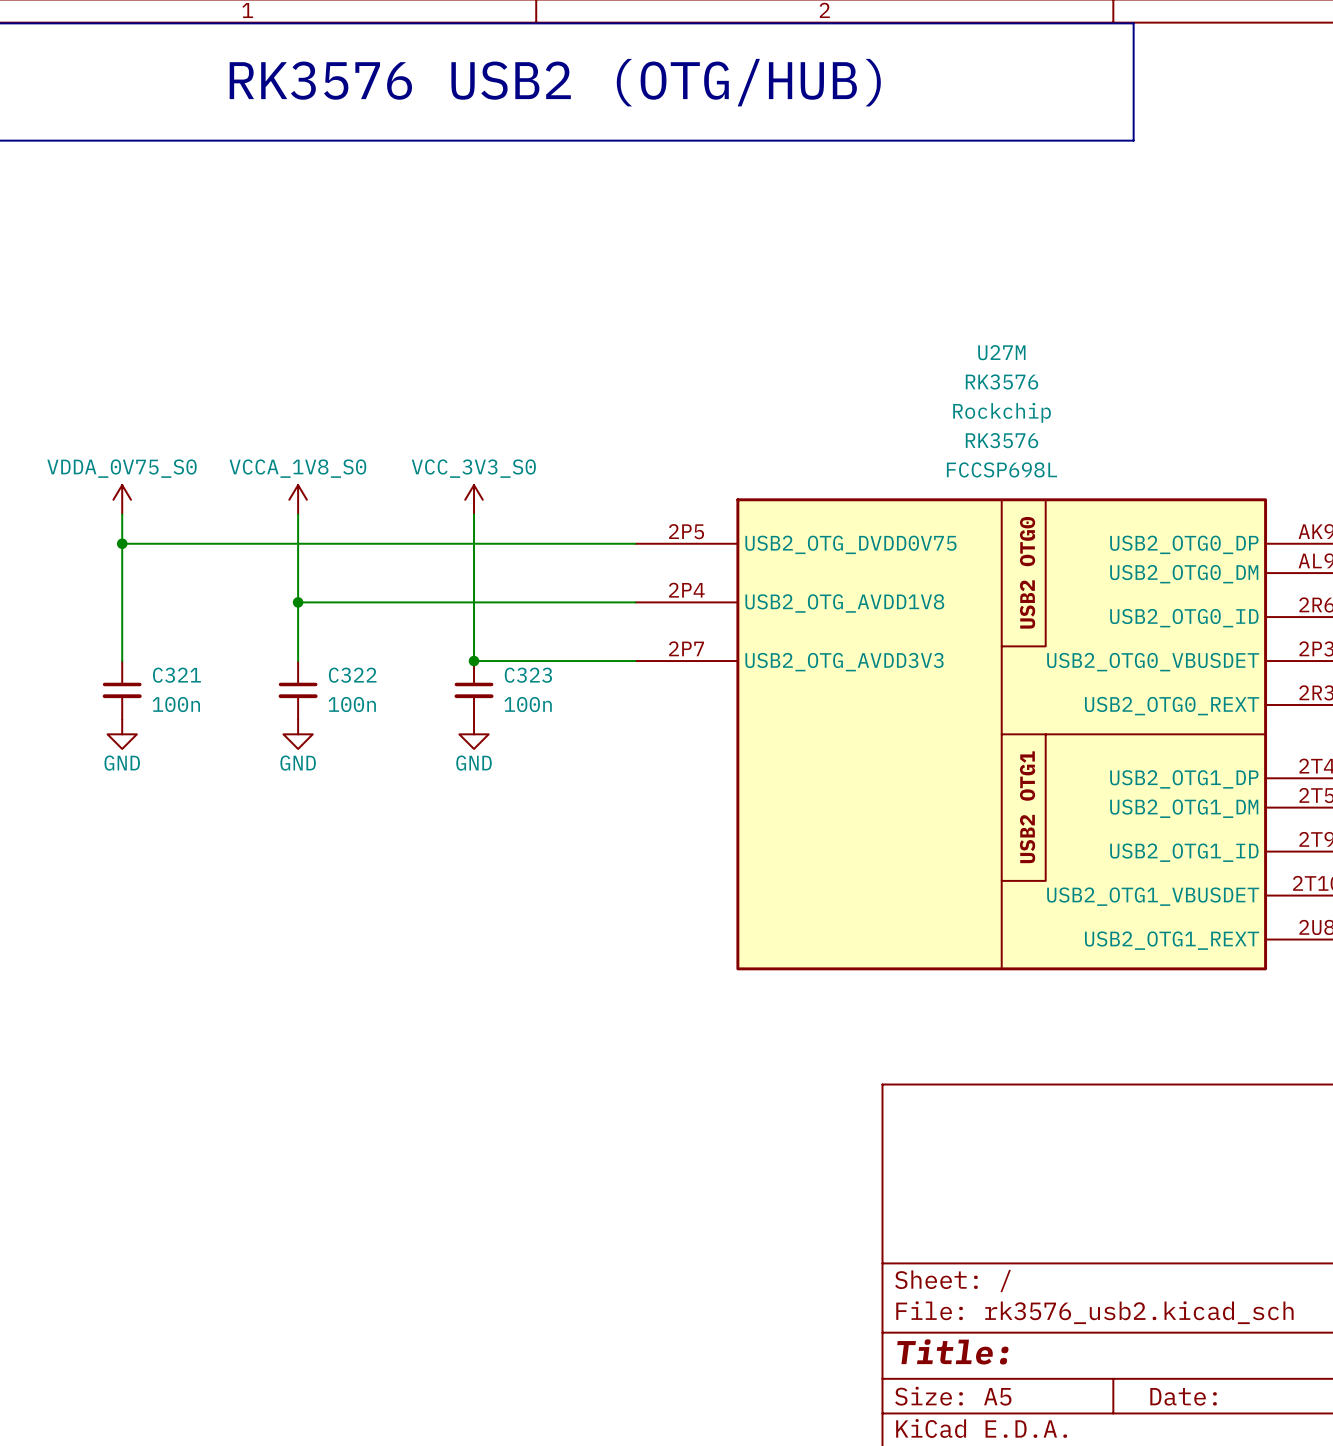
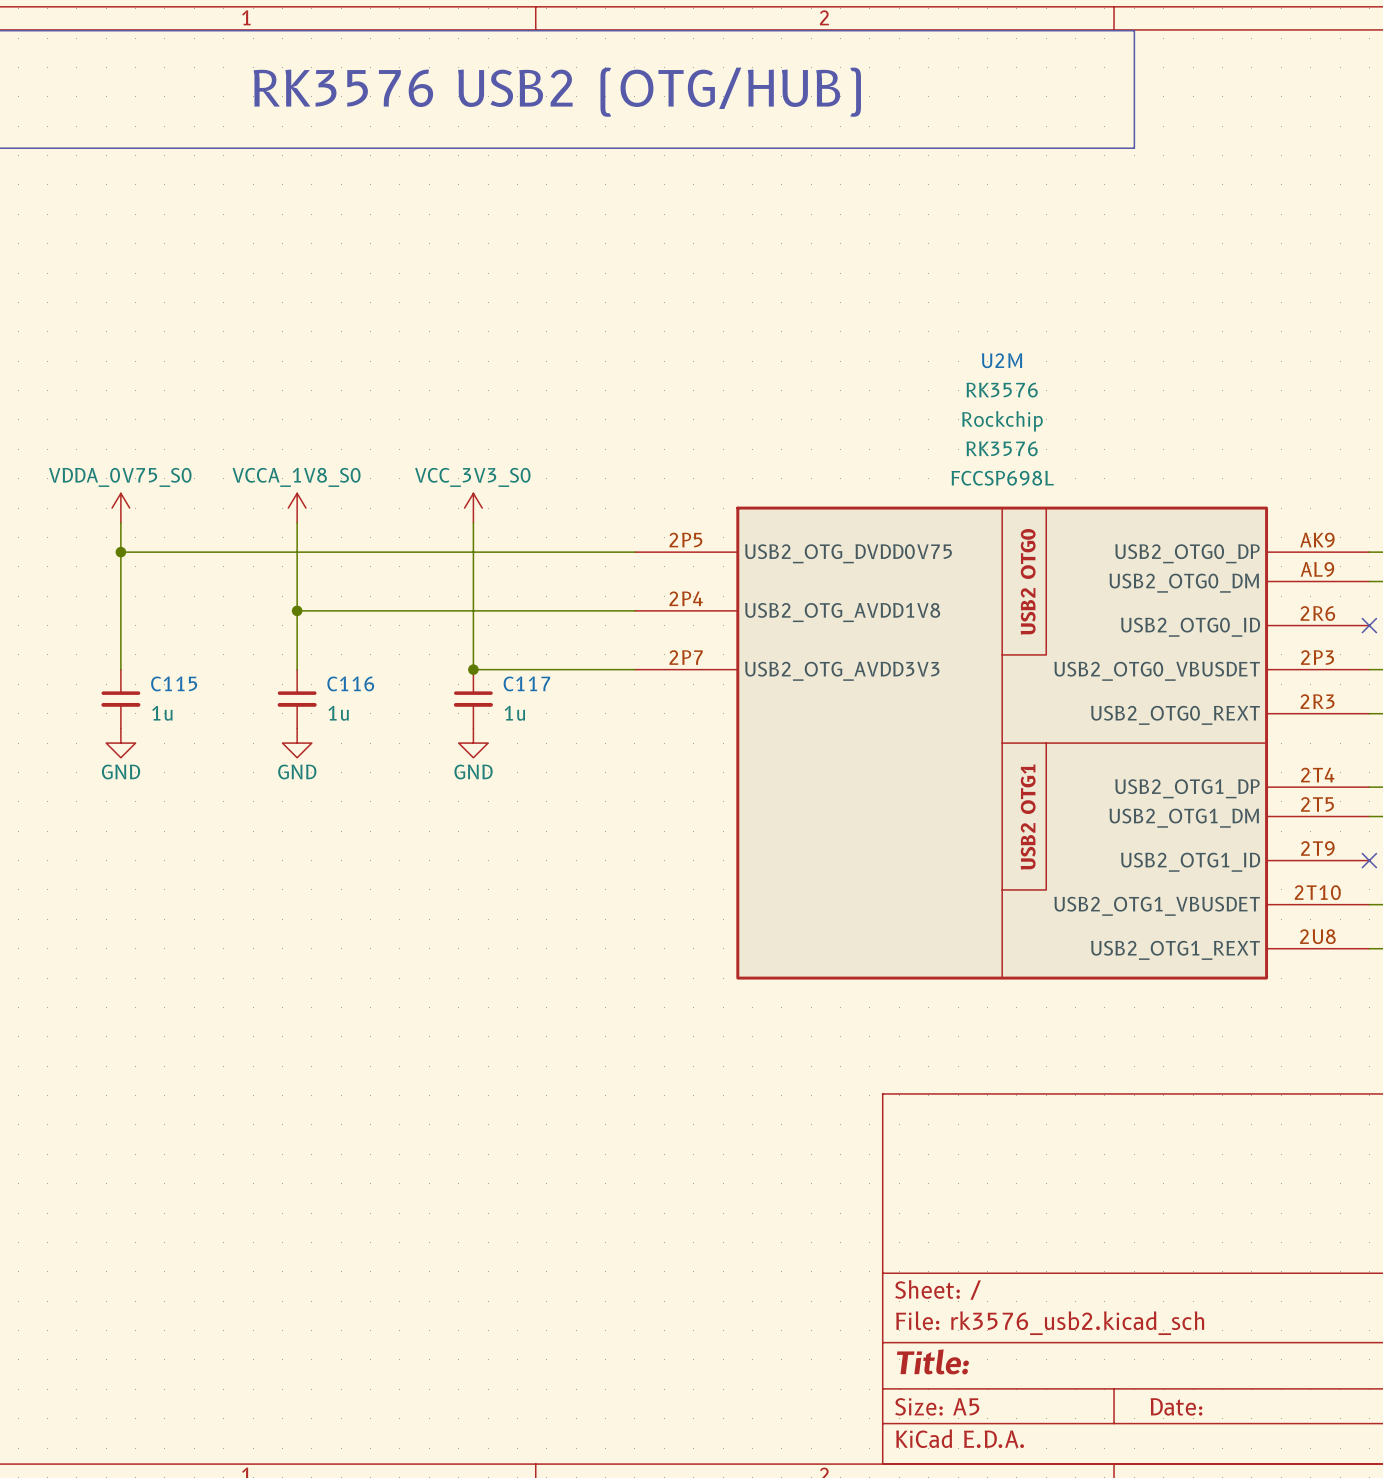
U27M name: U27M (1001, 352) -> U2M (1001, 360)
C321 name: C321 (176, 675) -> C115 (174, 683)
C322 name: C322 (352, 675) -> C116 (350, 683)
C323 name: C323 (528, 675) -> C117 (526, 683)
C321 value: 100n (176, 704) -> 1u (162, 713)
C322 value: 100n (352, 704) -> 1u (338, 713)
C323 value: 100n (528, 704) -> 1u (514, 713)

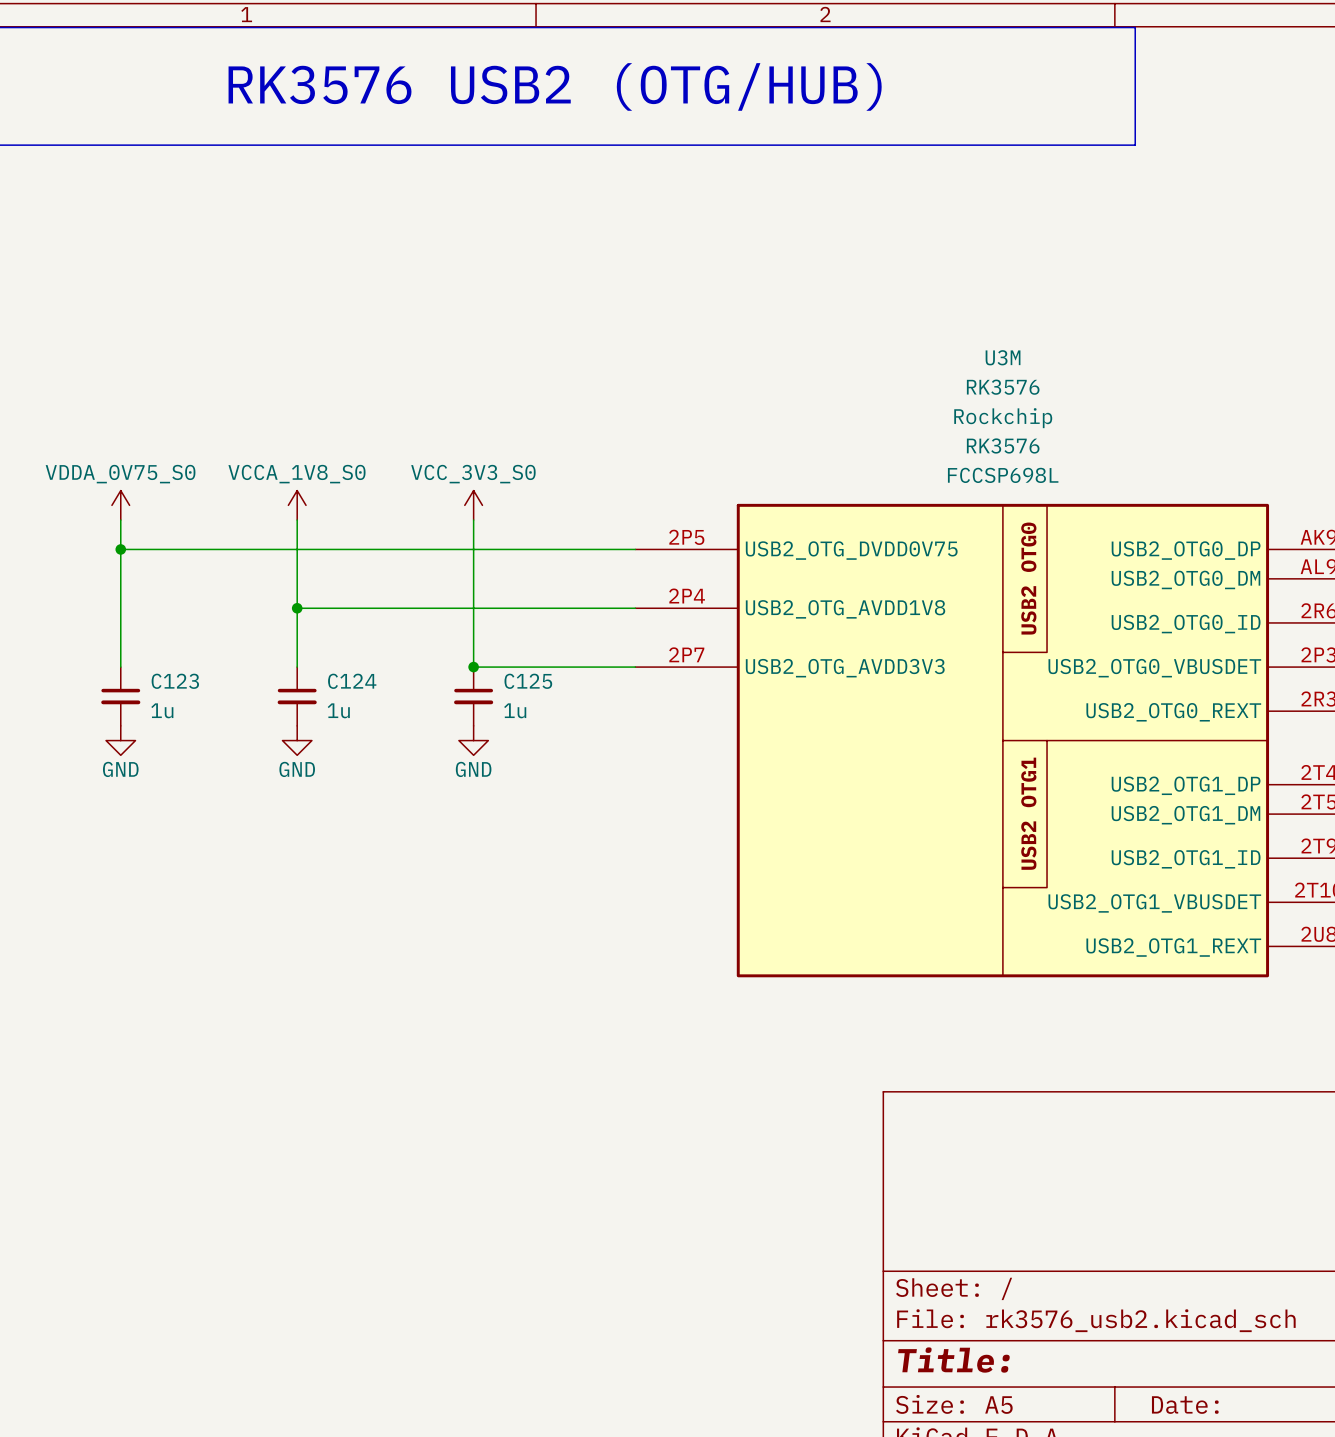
U2M name: U2M (1001, 360) -> U3M (1003, 357)
C115 name: C115 (174, 683) -> C123 (175, 681)
C116 name: C116 (350, 683) -> C124 (352, 681)
C117 name: C117 (526, 683) -> C125 (528, 681)

